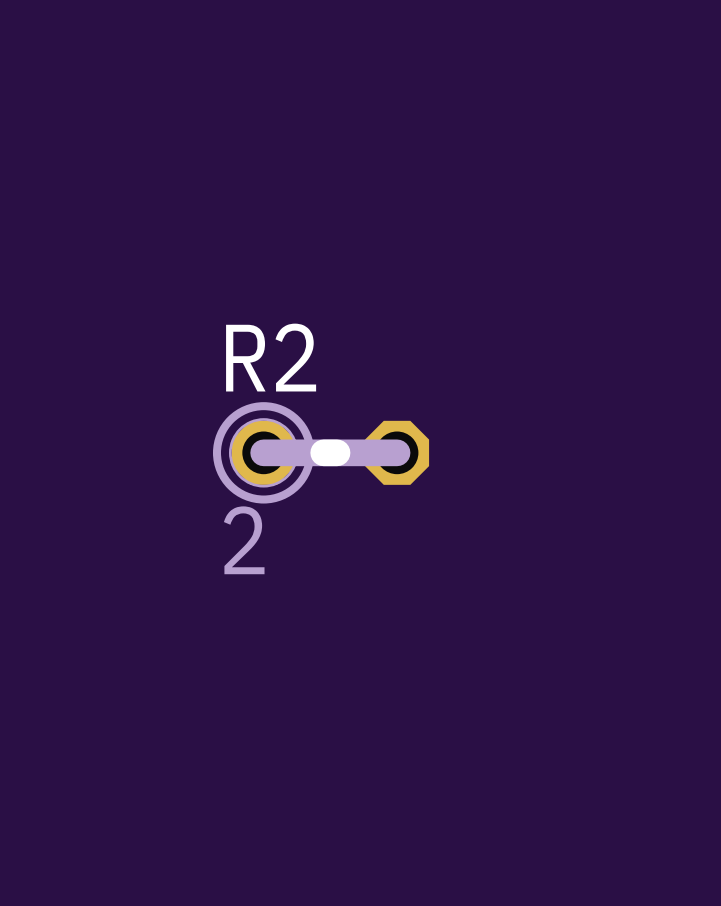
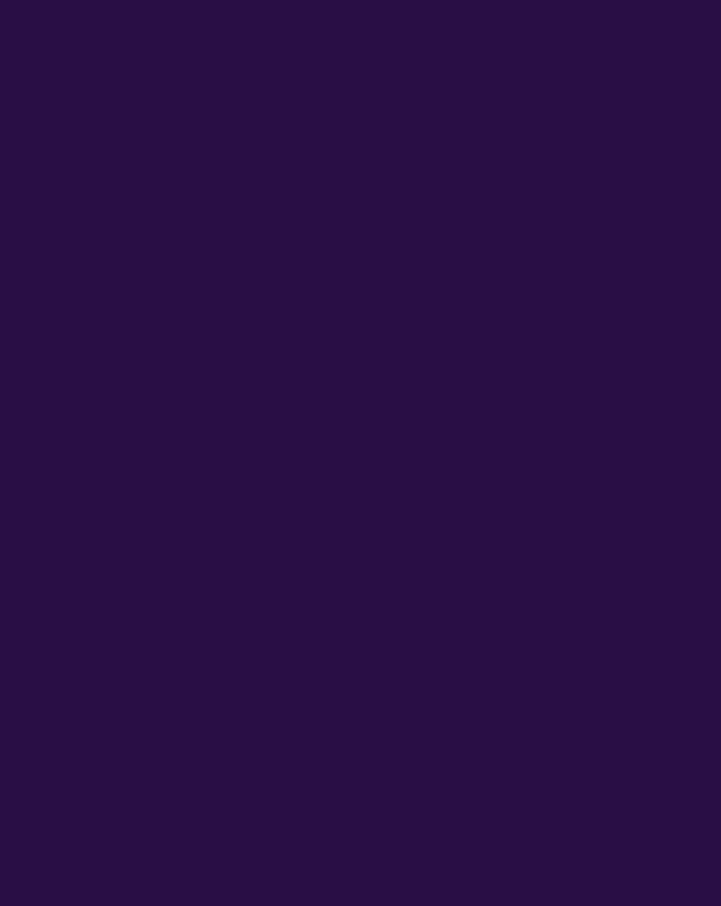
R2: 2 (321, 452) -> none

